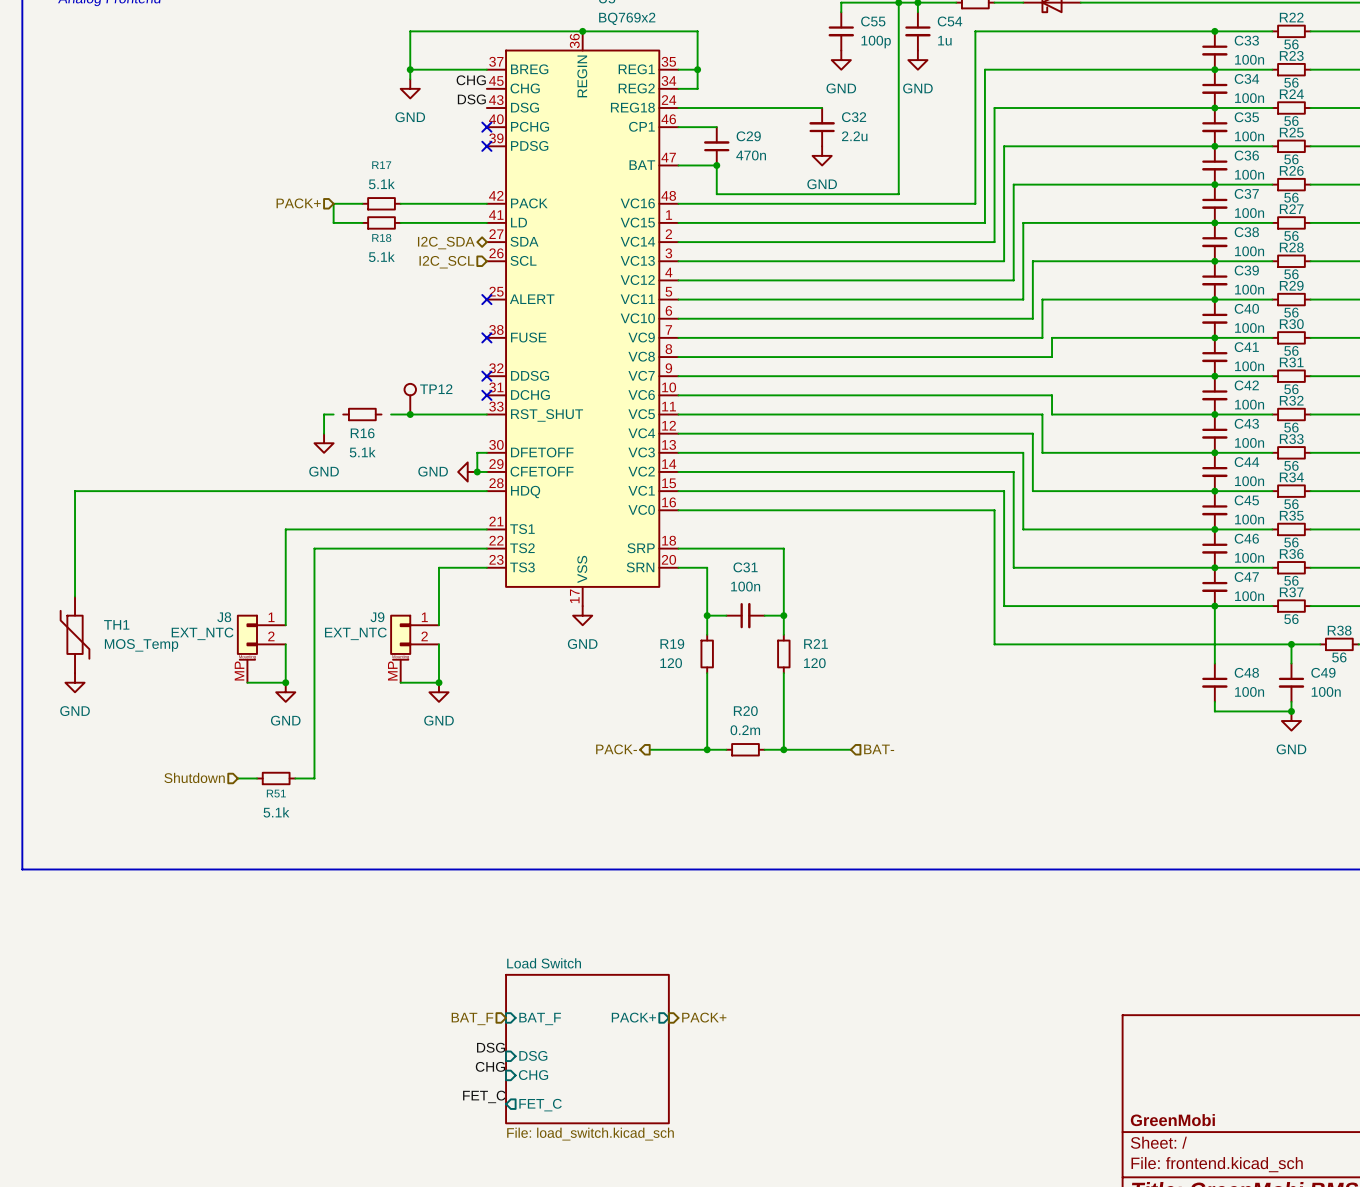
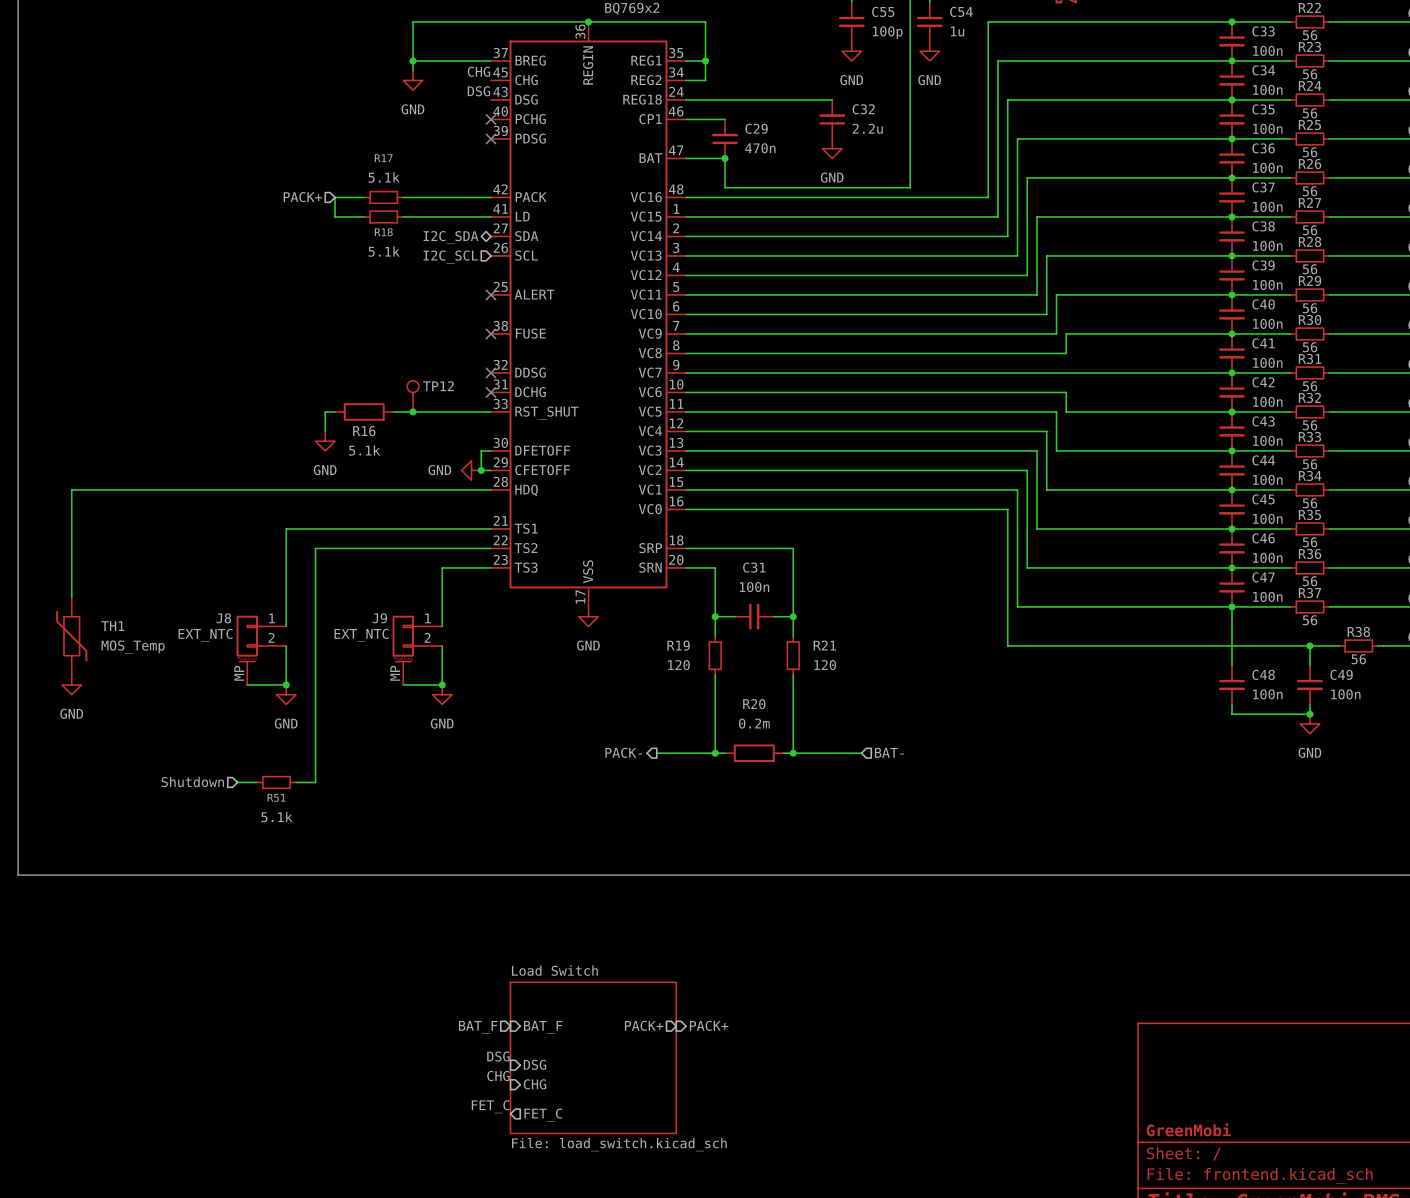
R16 symbol: [343, 407, 382, 422] -> [335, 403, 394, 421]
R20 symbol: [726, 743, 765, 757] -> [725, 744, 784, 762]

